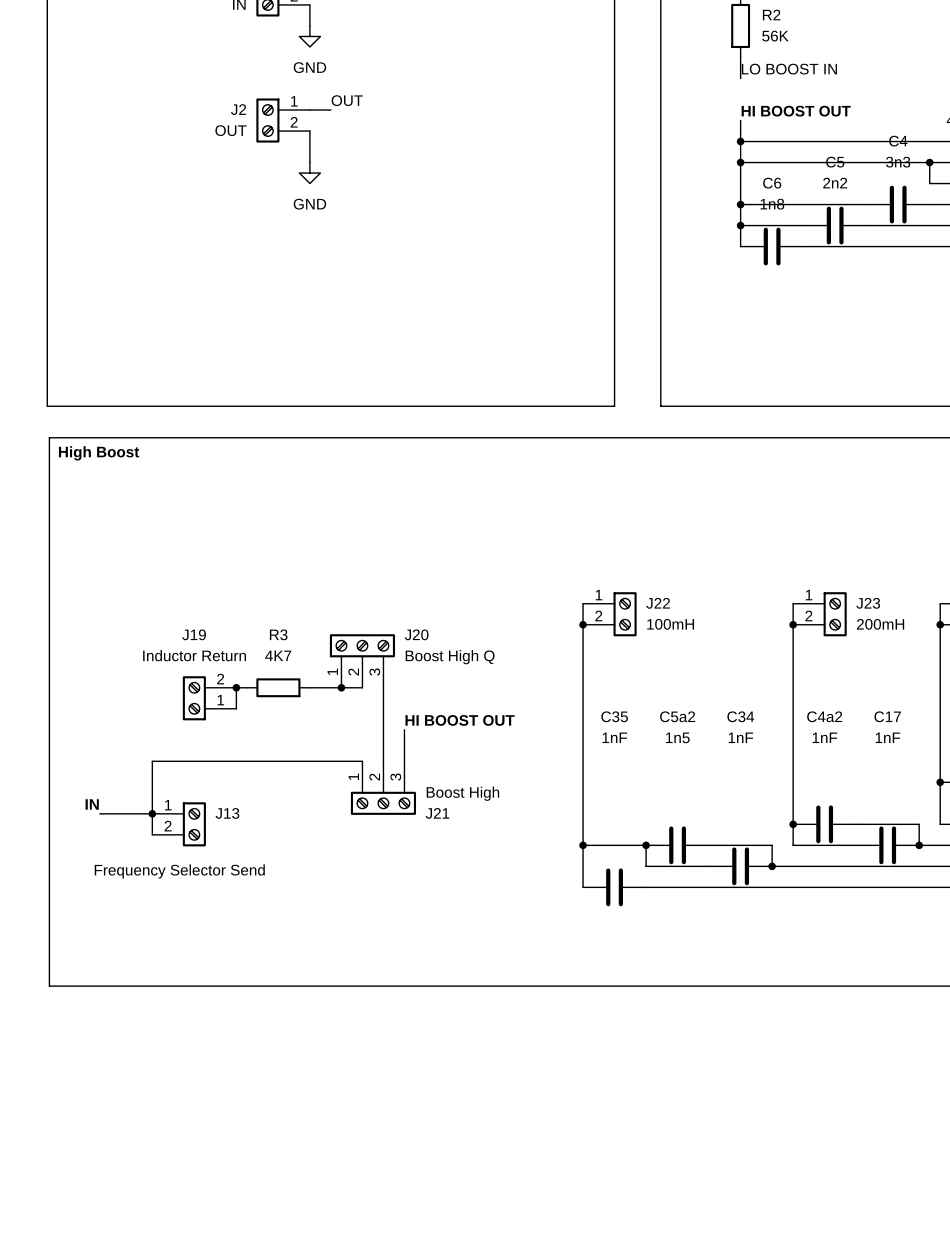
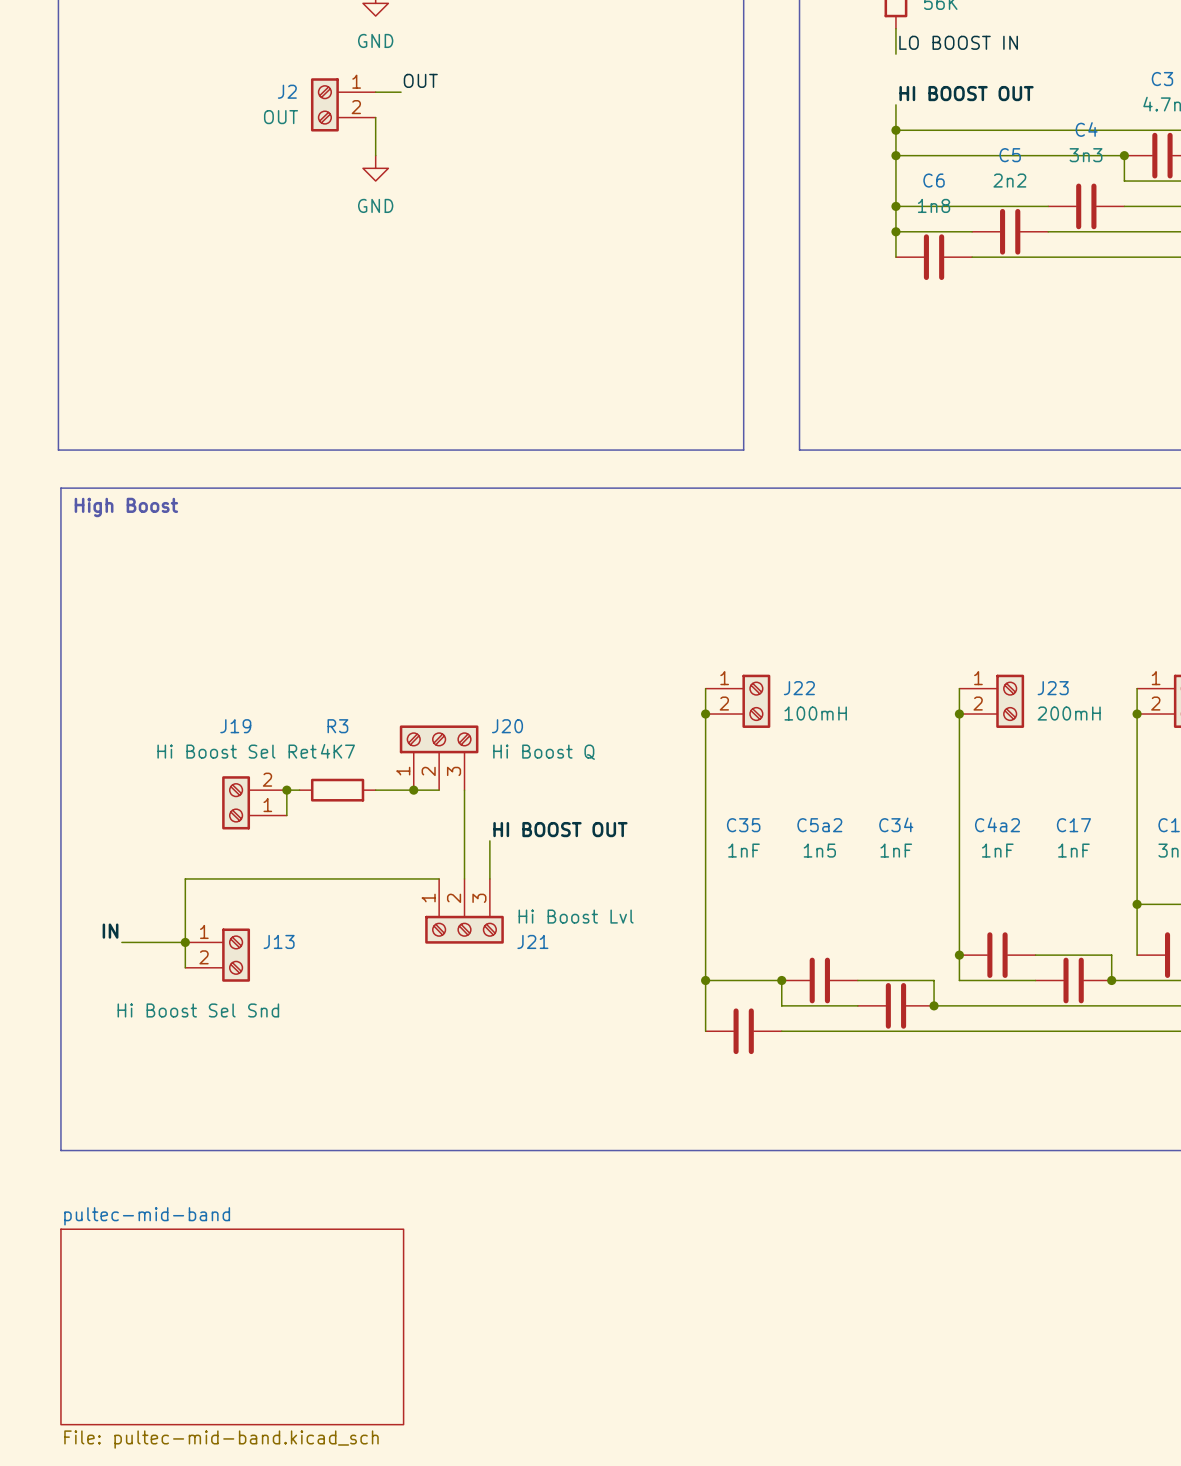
J19 value: Inductor Return (194, 655) -> Hi Boost Sel Ret (236, 751)
J20 value: Boost High Q (450, 657) -> Hi Boost Q (544, 752)
J21 value: Boost High (462, 793) -> Hi Boost Lvl (576, 916)
J13 value: Frequency Selector Send (179, 871) -> Hi Boost Sel Snd (198, 1010)
sheet pultec-mid-band: none -> File: pultec-mid-band.kicad_sch (232, 1326)

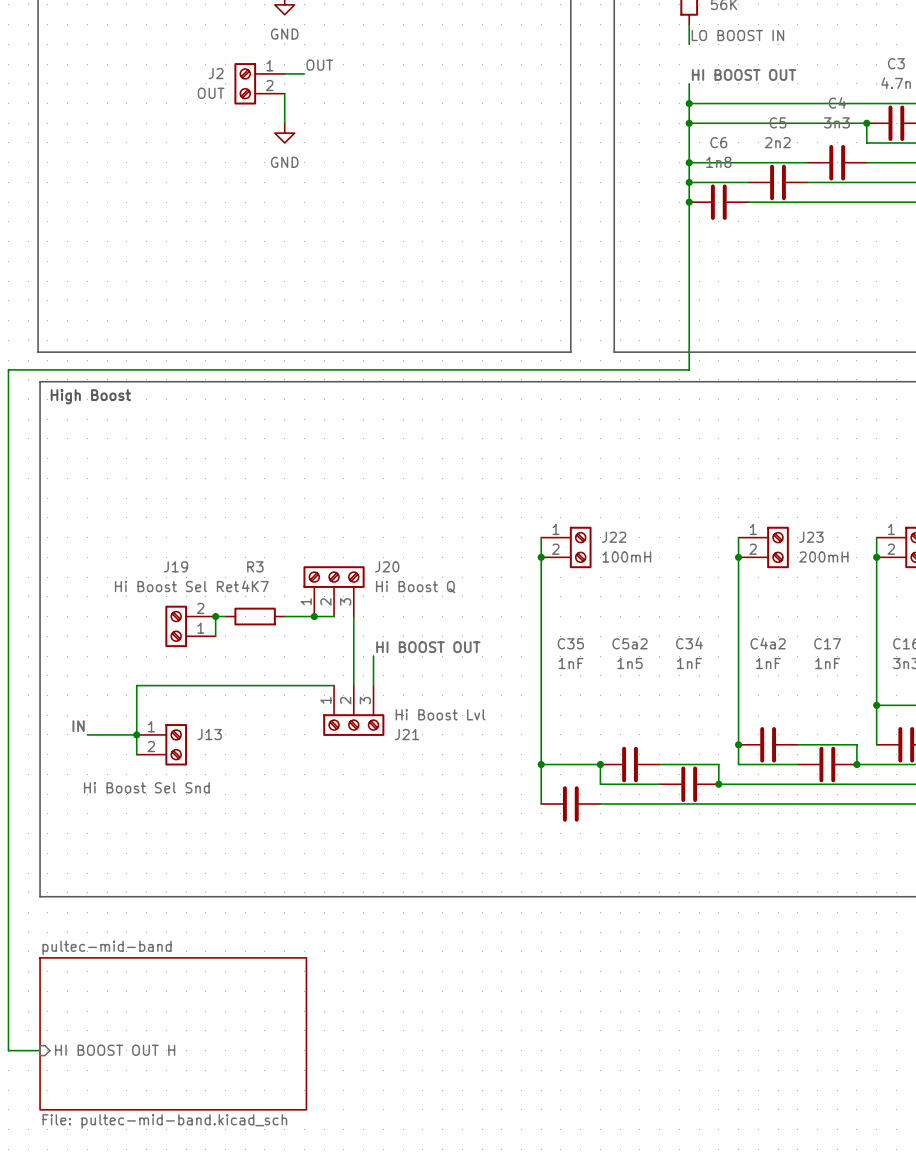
wire: none -> (689, 202) (689, 369) (8, 369) (8, 1050) (40, 1050)
junction: none -> (689, 202)
sheet pin: none -> HI BOOST OUT H (115, 1050)

